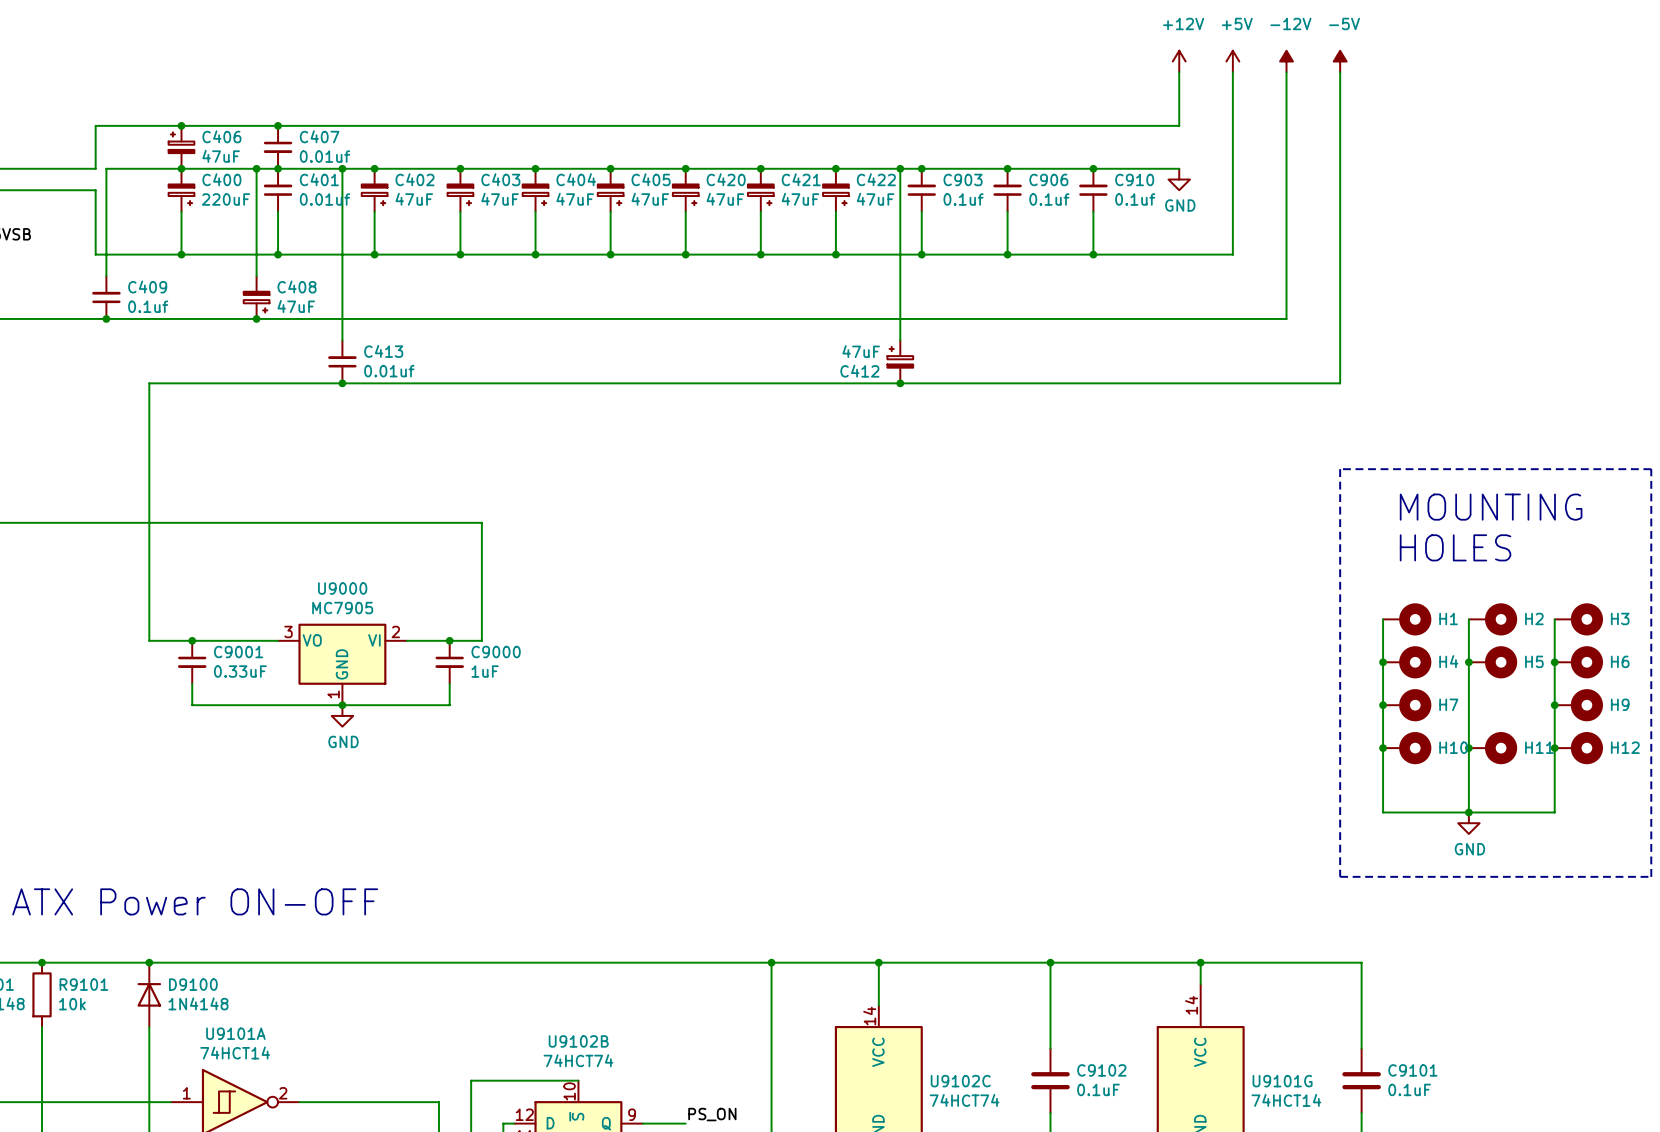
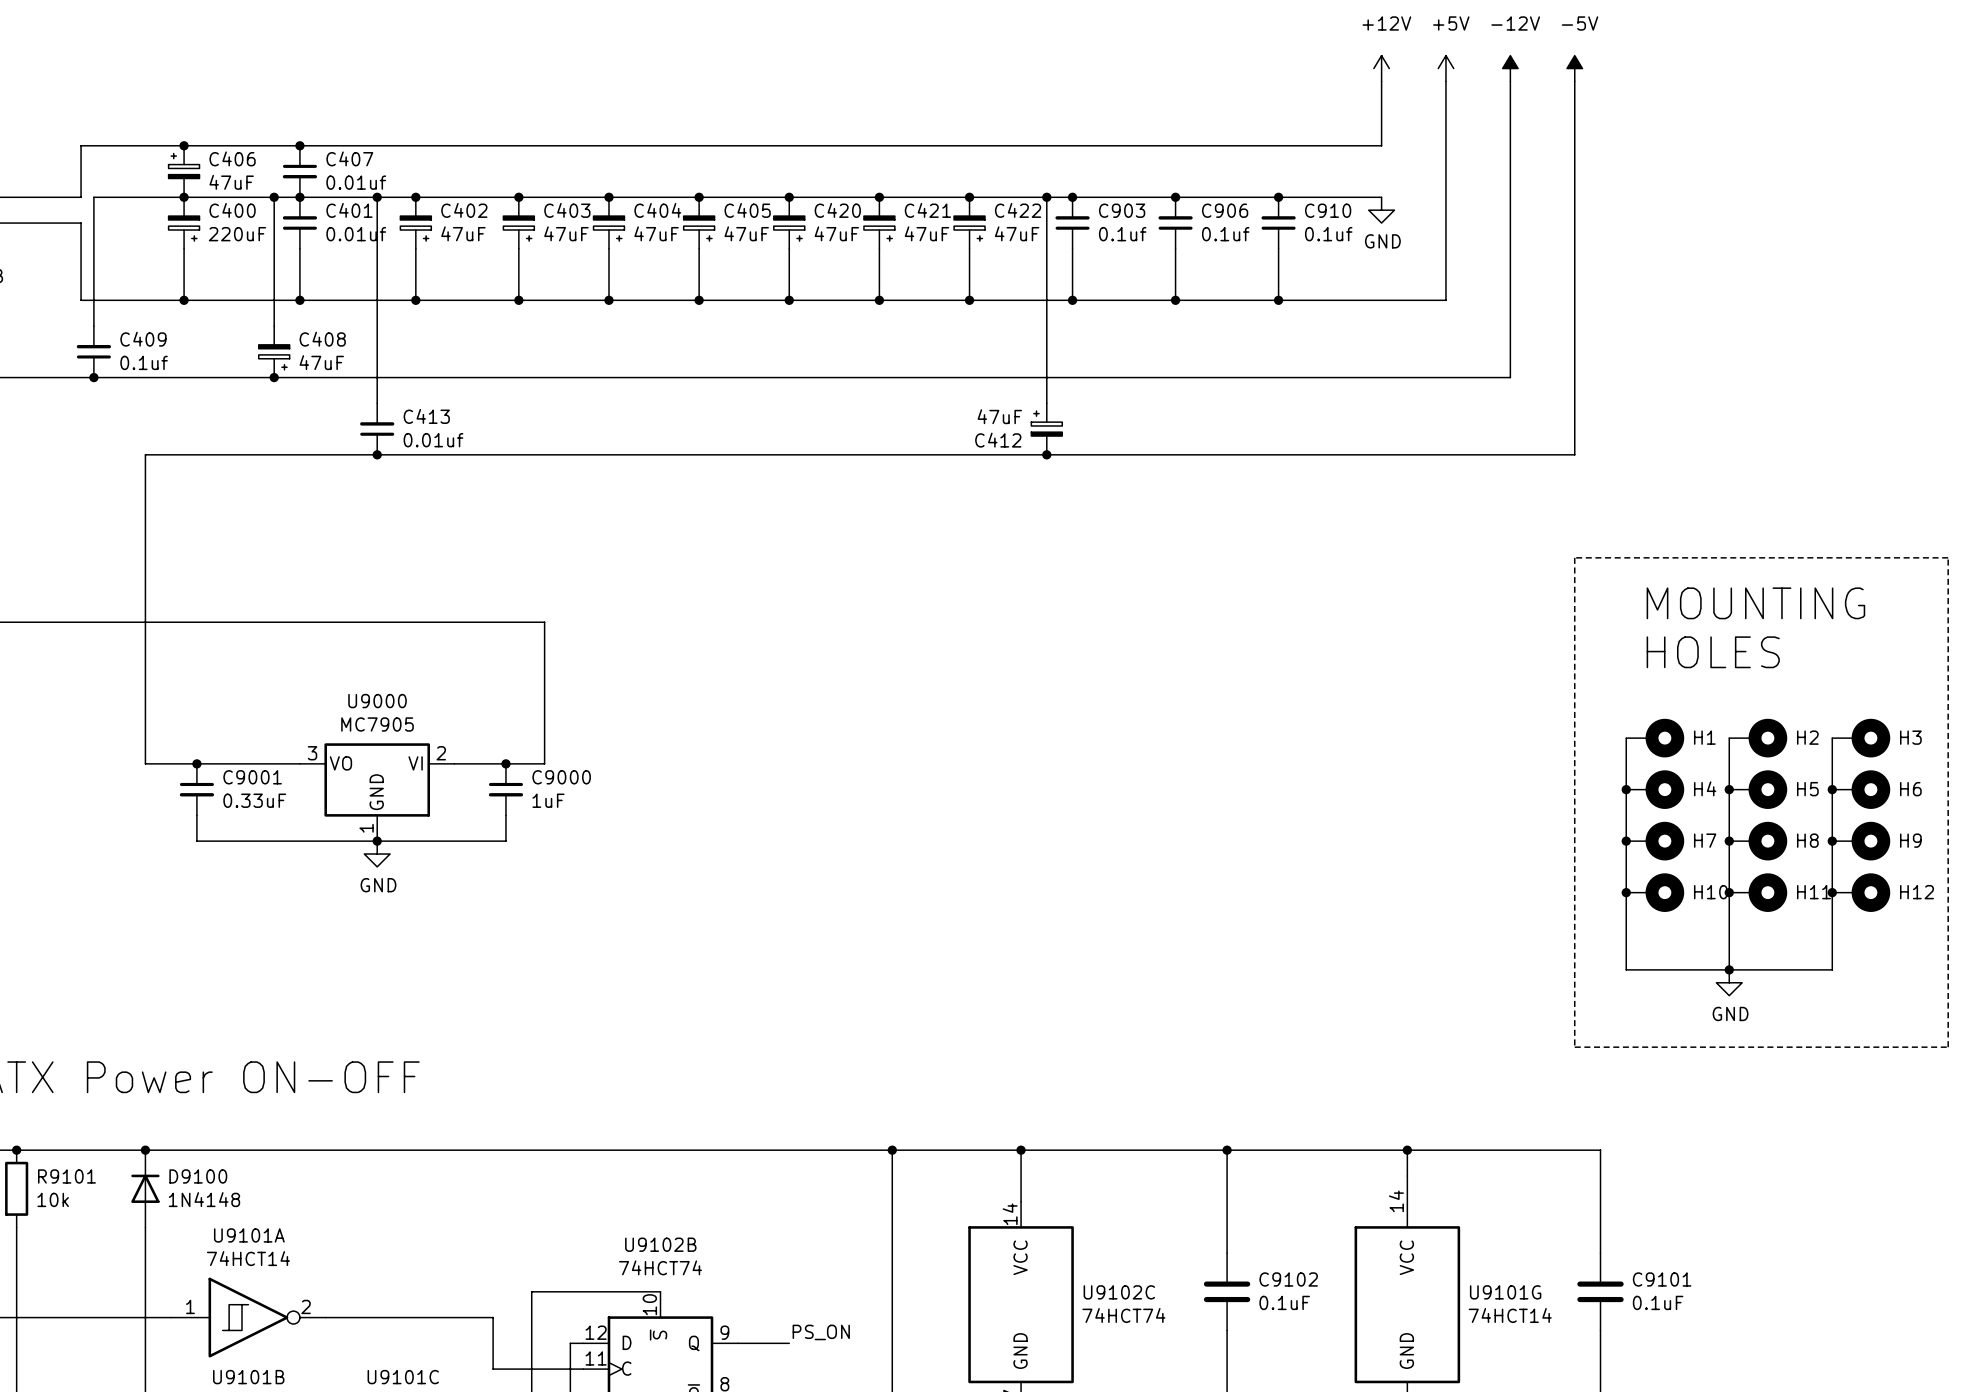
junction: none -> (1729, 841)
H8: none -> (1758, 841)

